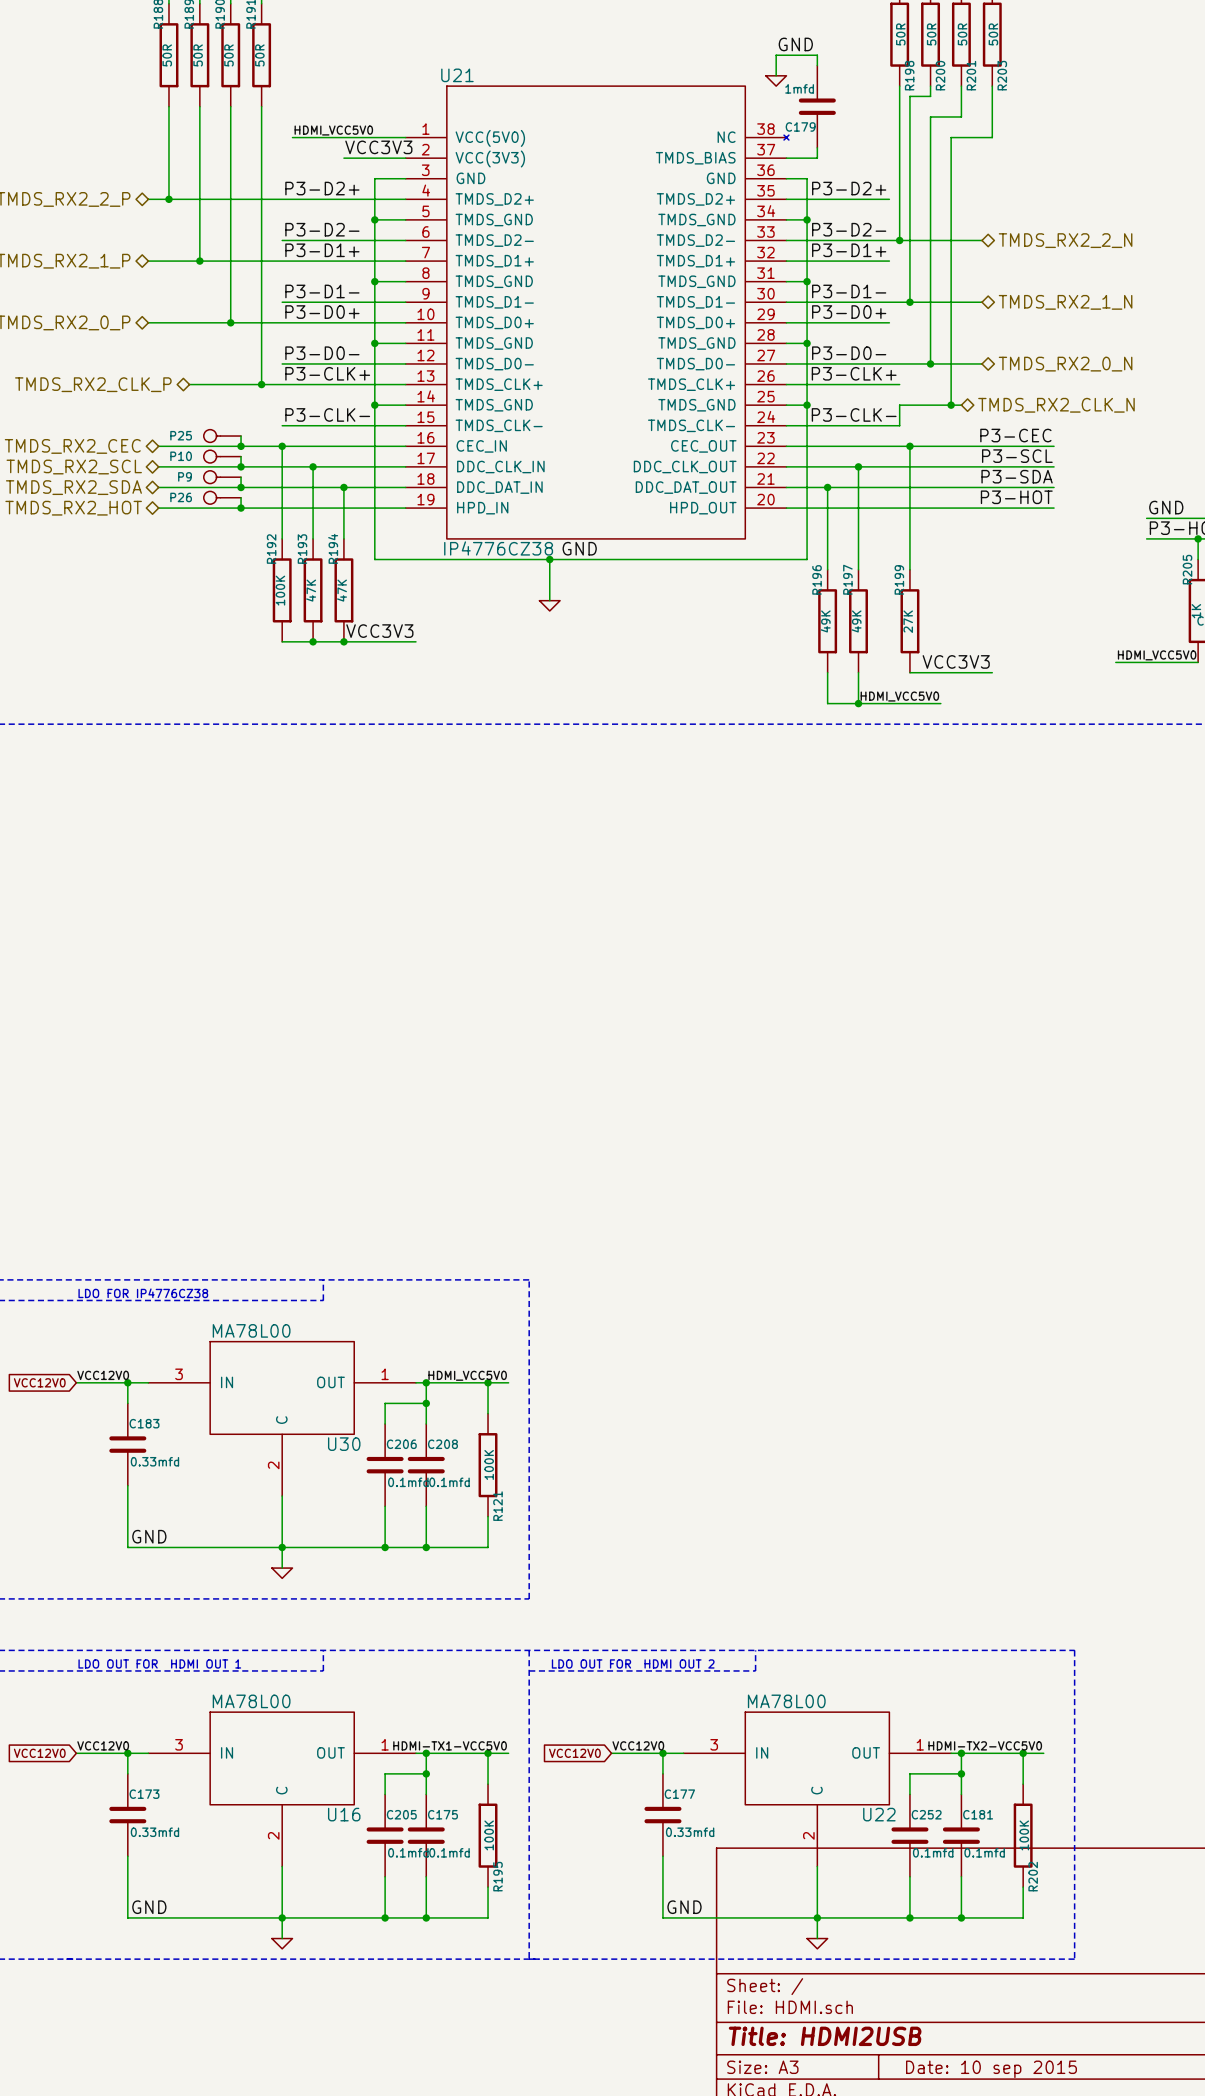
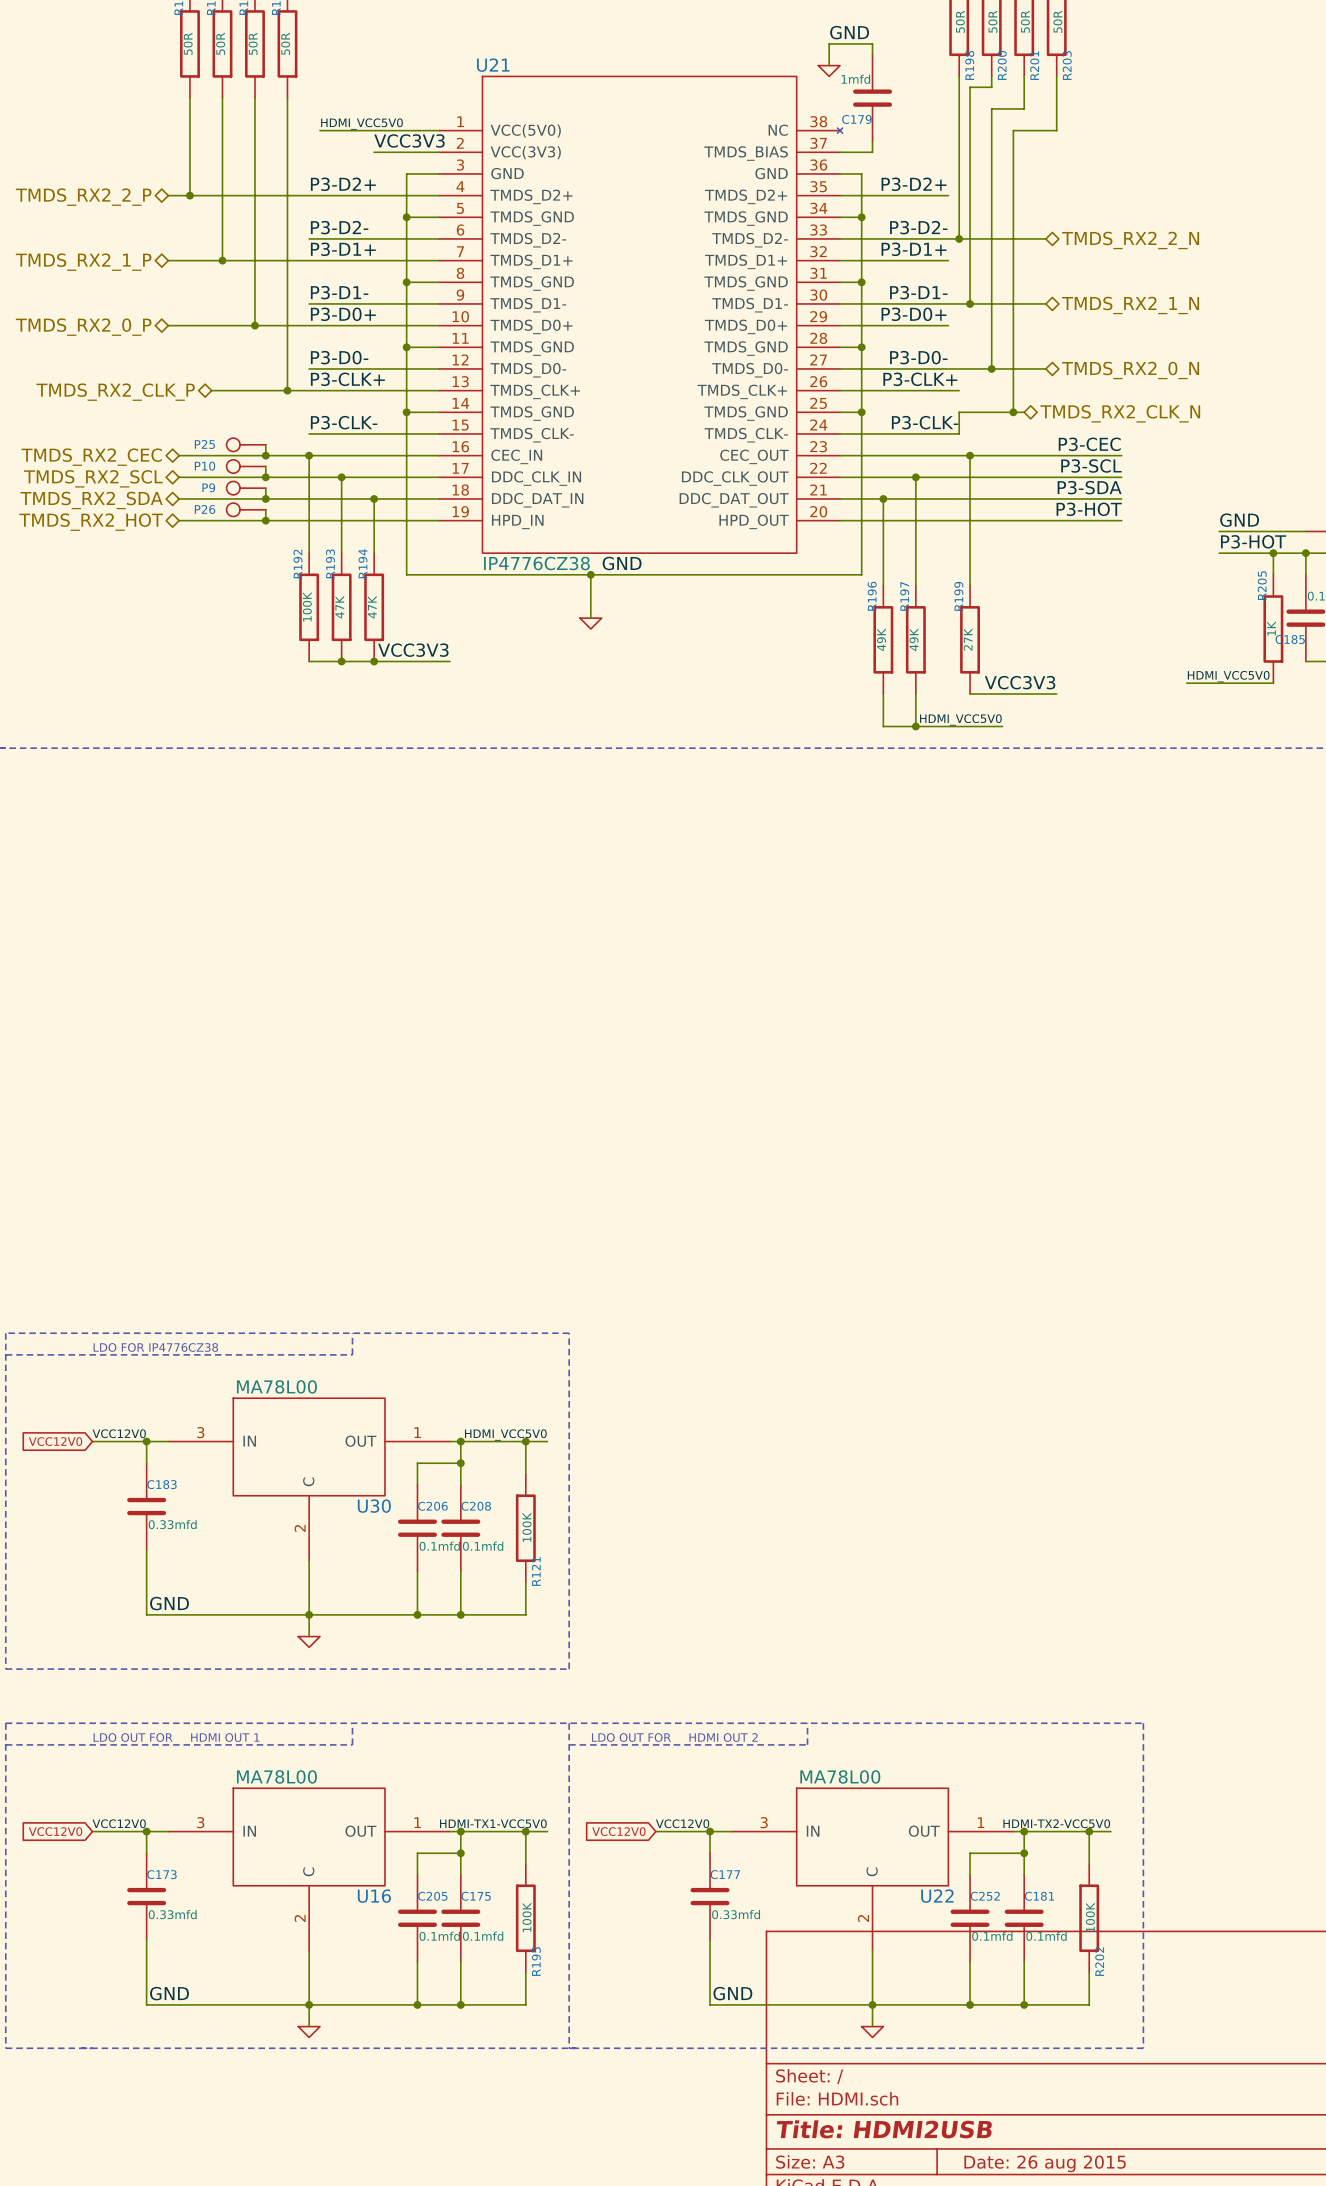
title block: Date: 10 sep 2015 (991, 2069) -> Date: 26 aug 2015 (1045, 2163)

